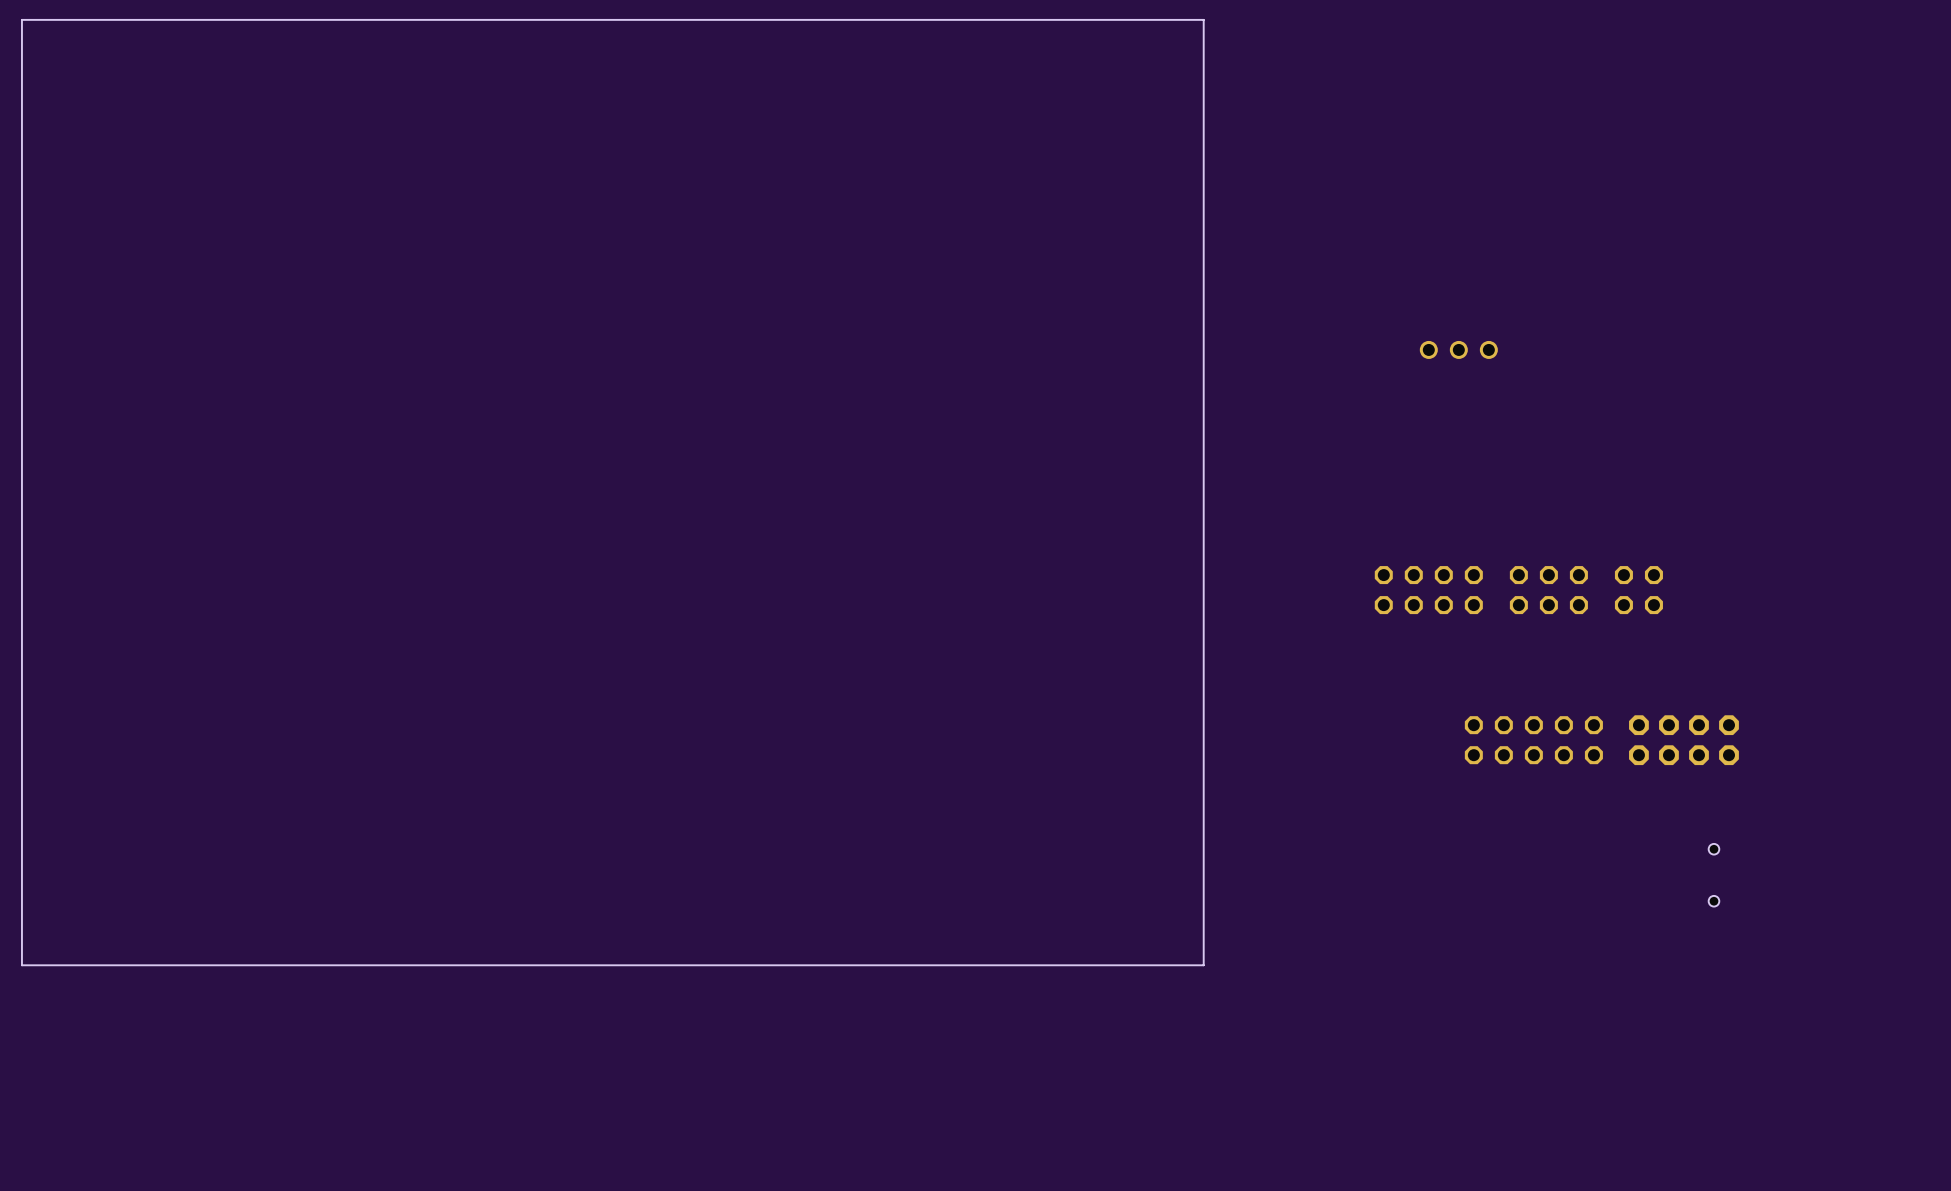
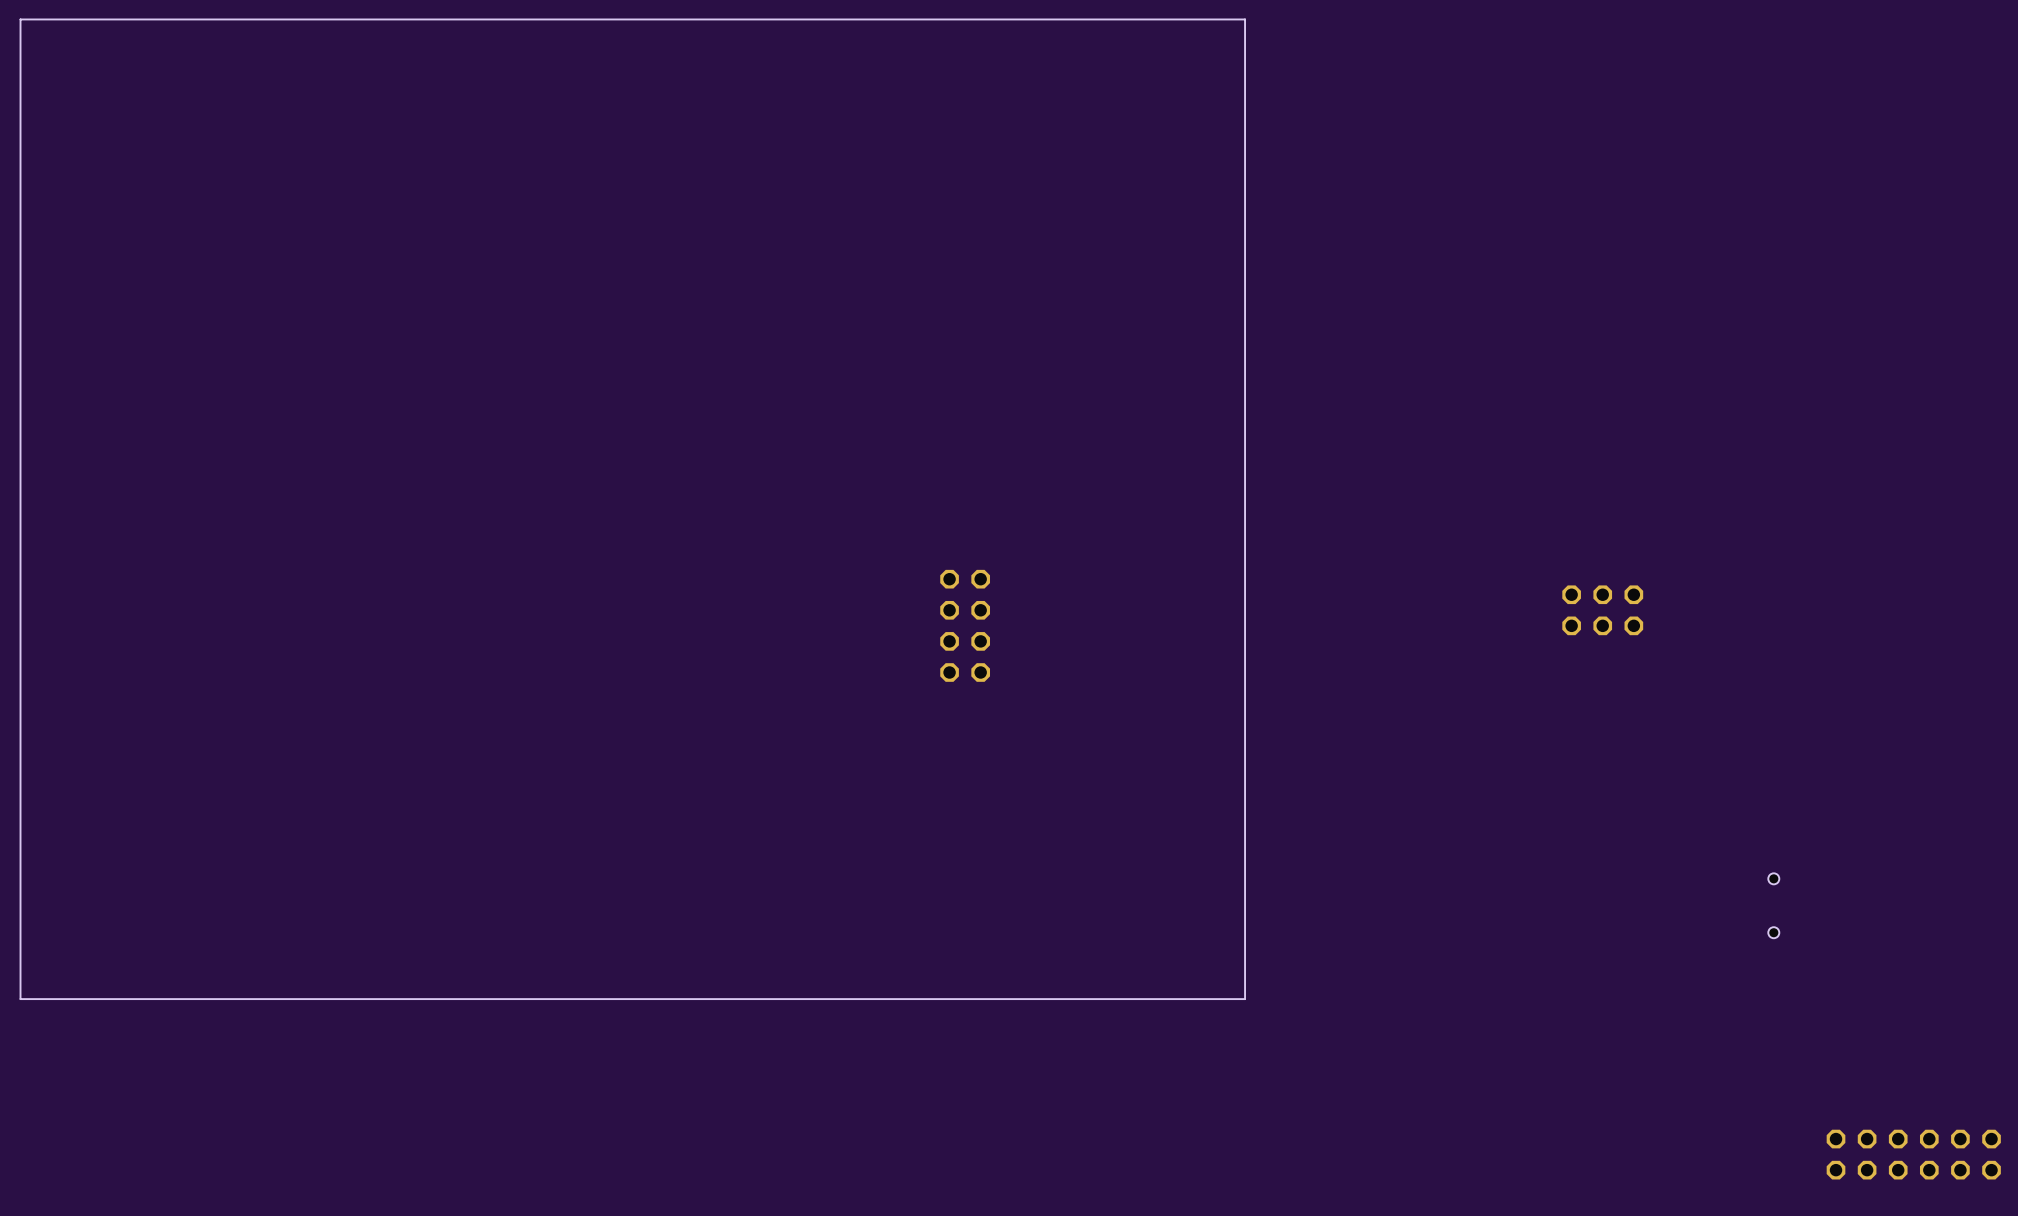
part: (1458, 349) -> none
part: (1428, 590) -> none
part: (1638, 590) -> none
part: none -> (965, 625)
part: (1533, 740) -> none
part: (1683, 740) -> none
part: none -> (1913, 1154)

